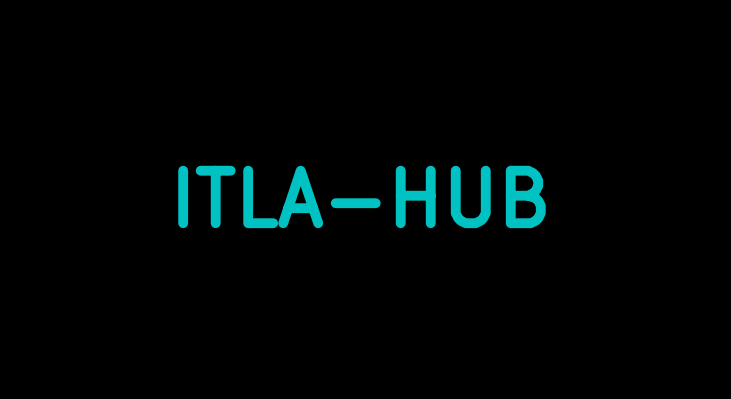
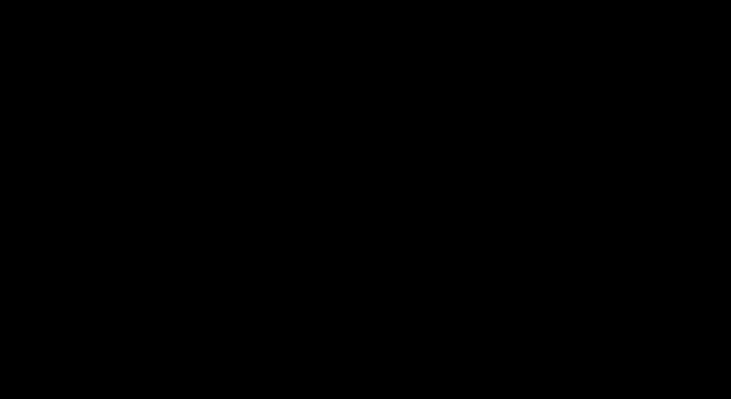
text: ITLA-HUB (361, 196) -> none

